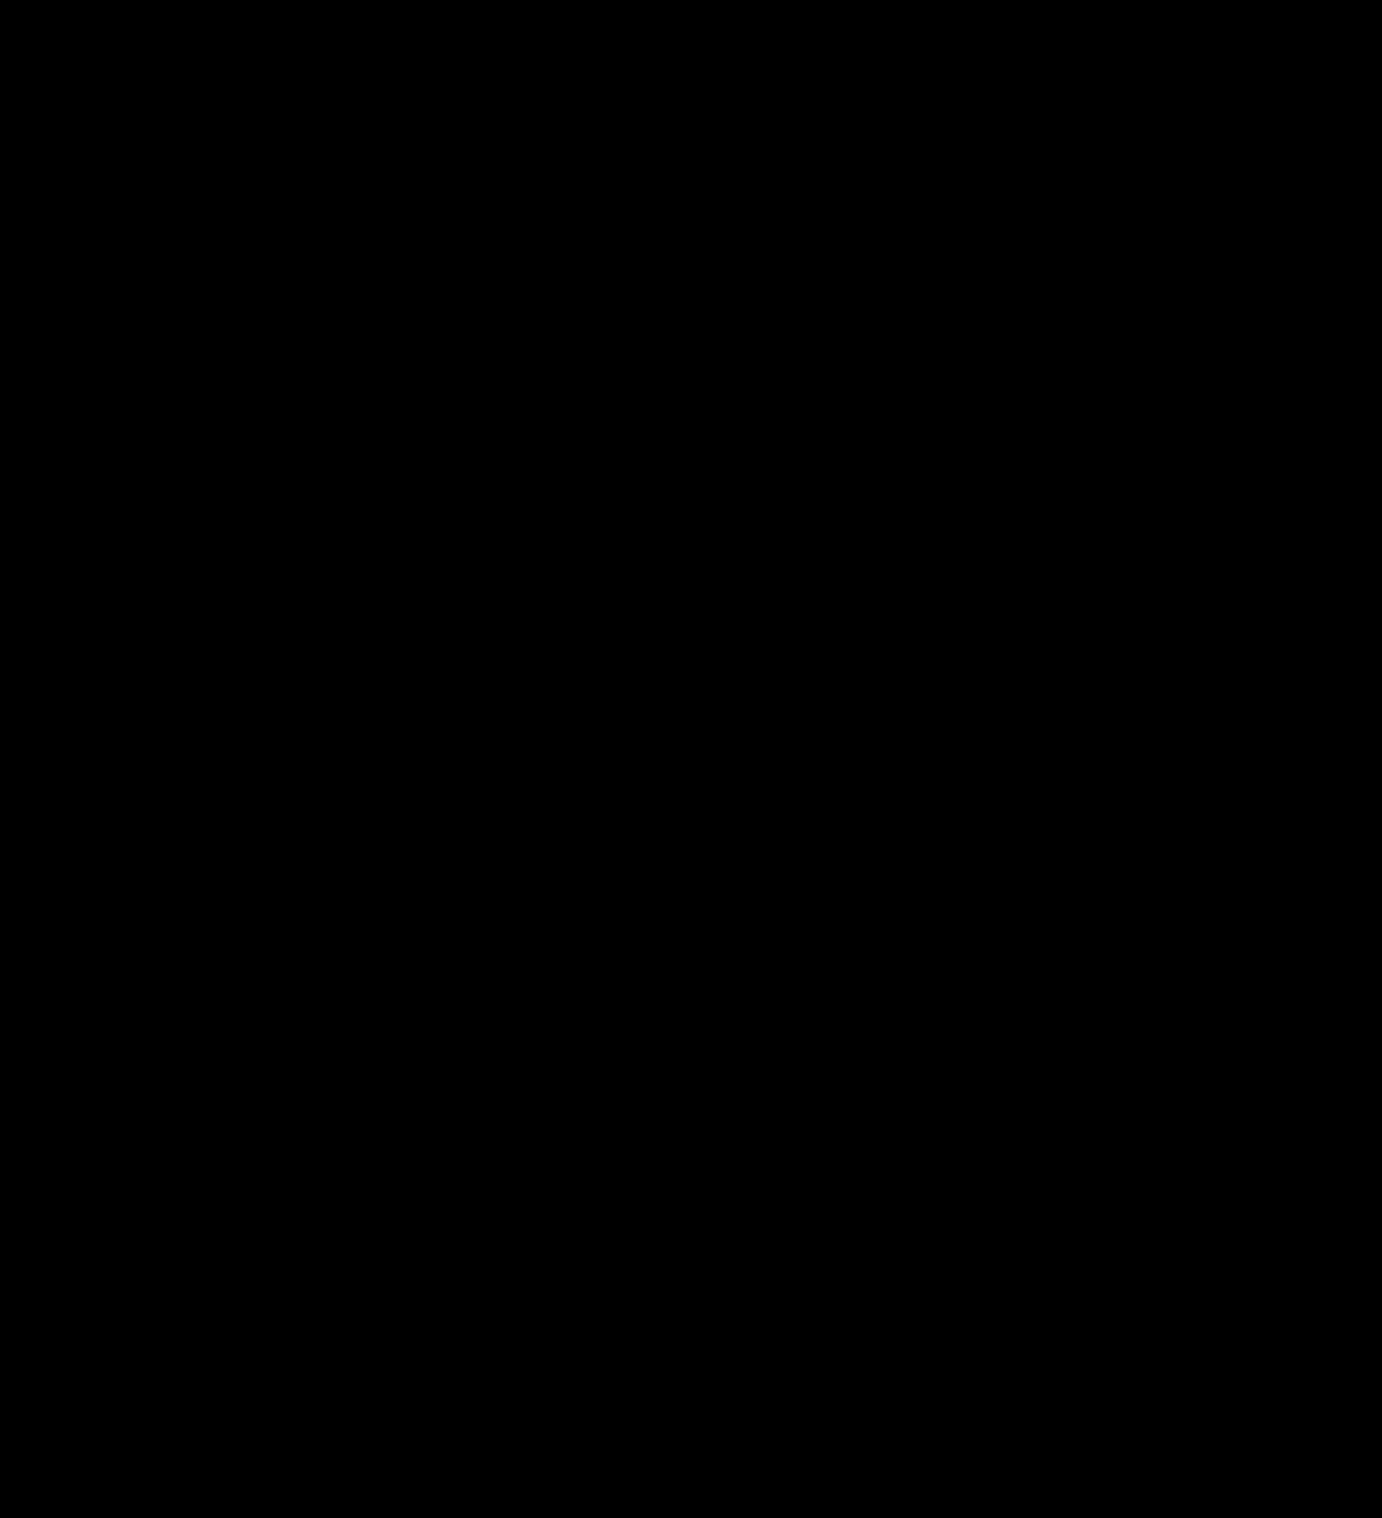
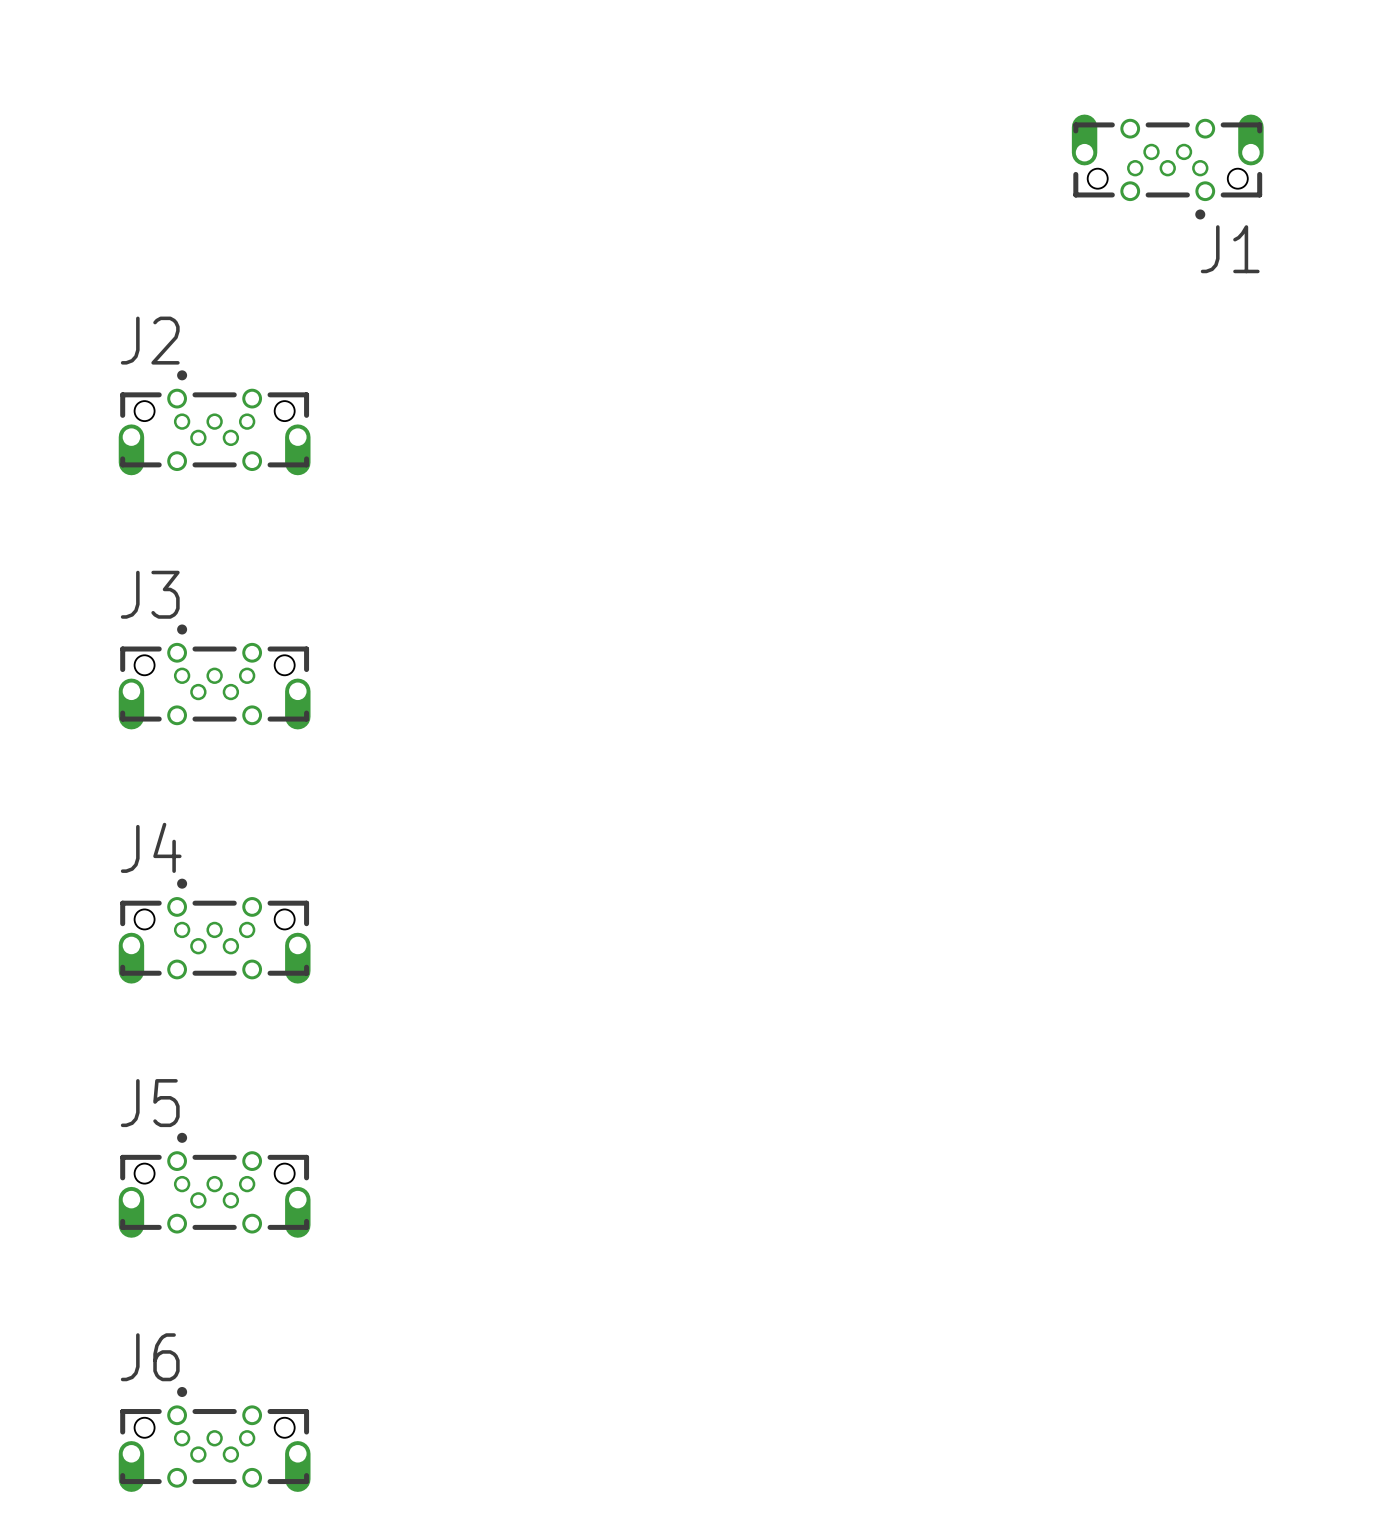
J1: none -> (1167, 167)
J2: none -> (214, 422)
J3: none -> (214, 676)
J4: none -> (214, 931)
J5: none -> (214, 1185)
J6: none -> (214, 1439)

